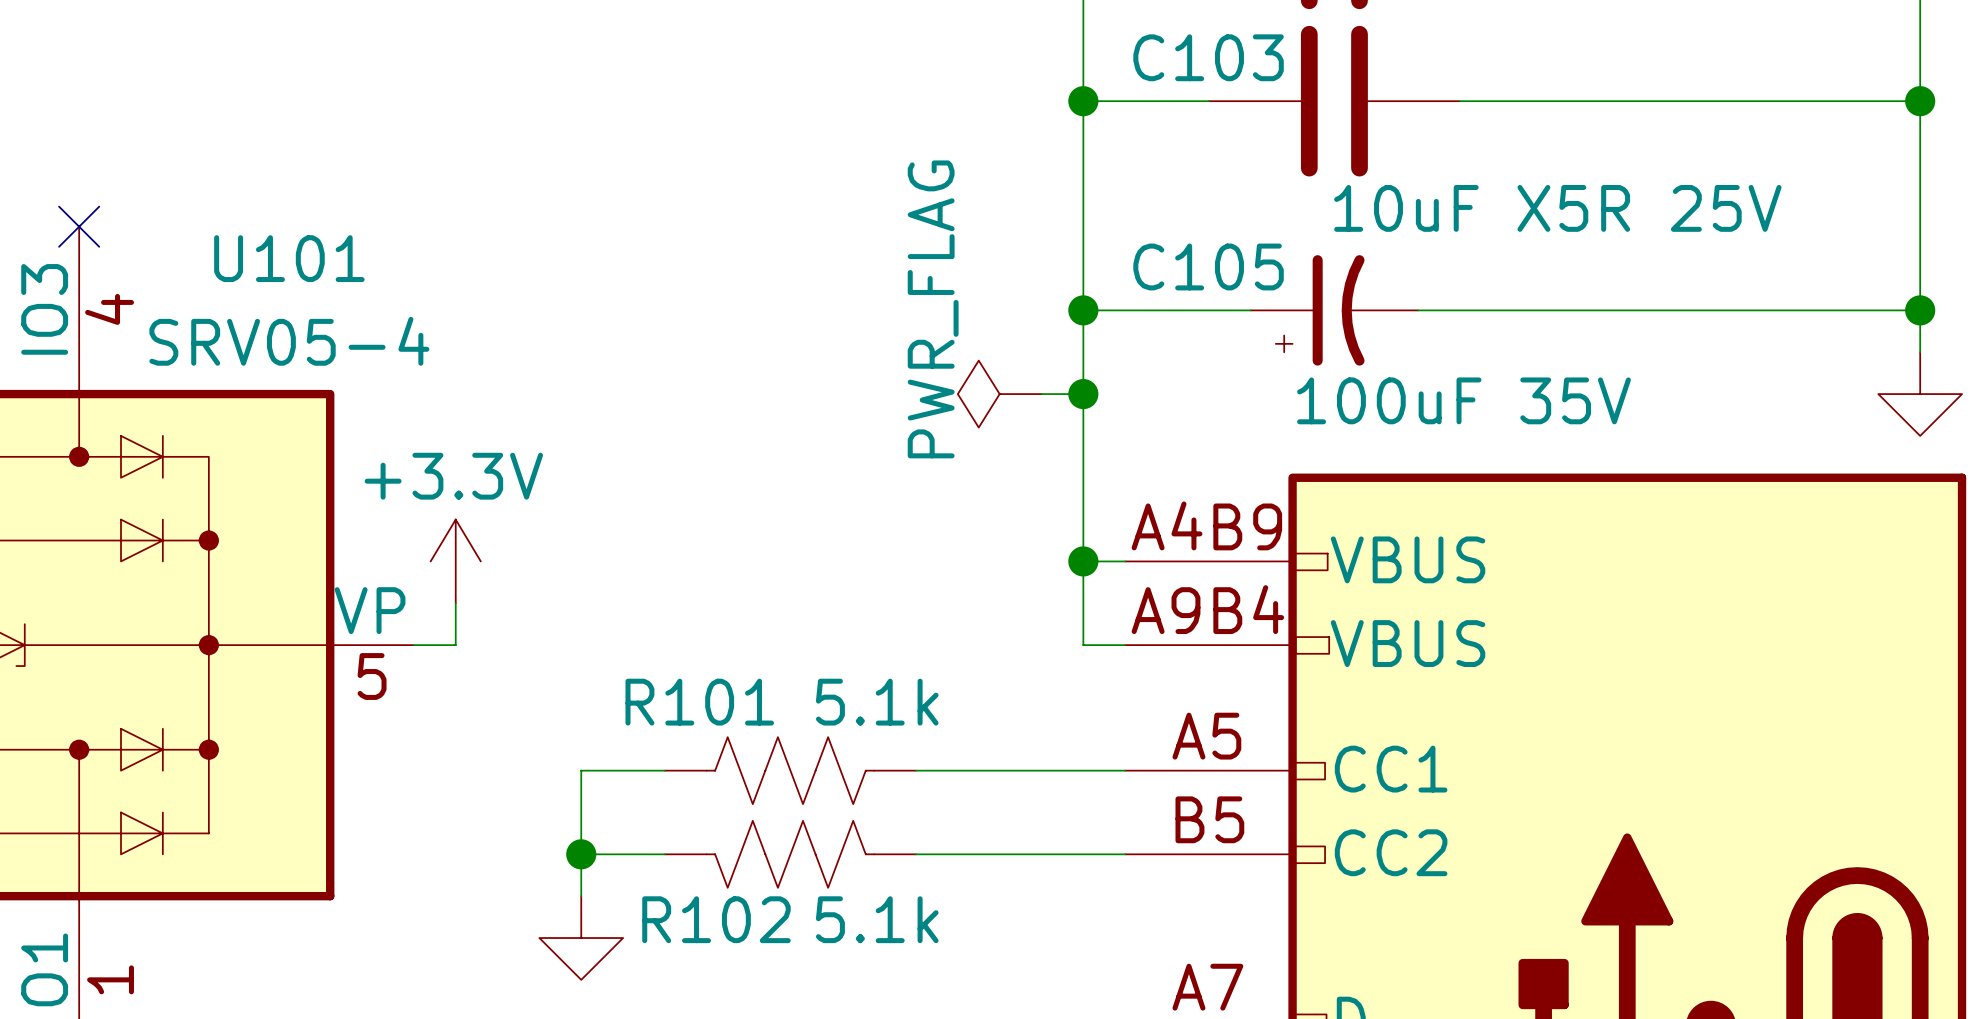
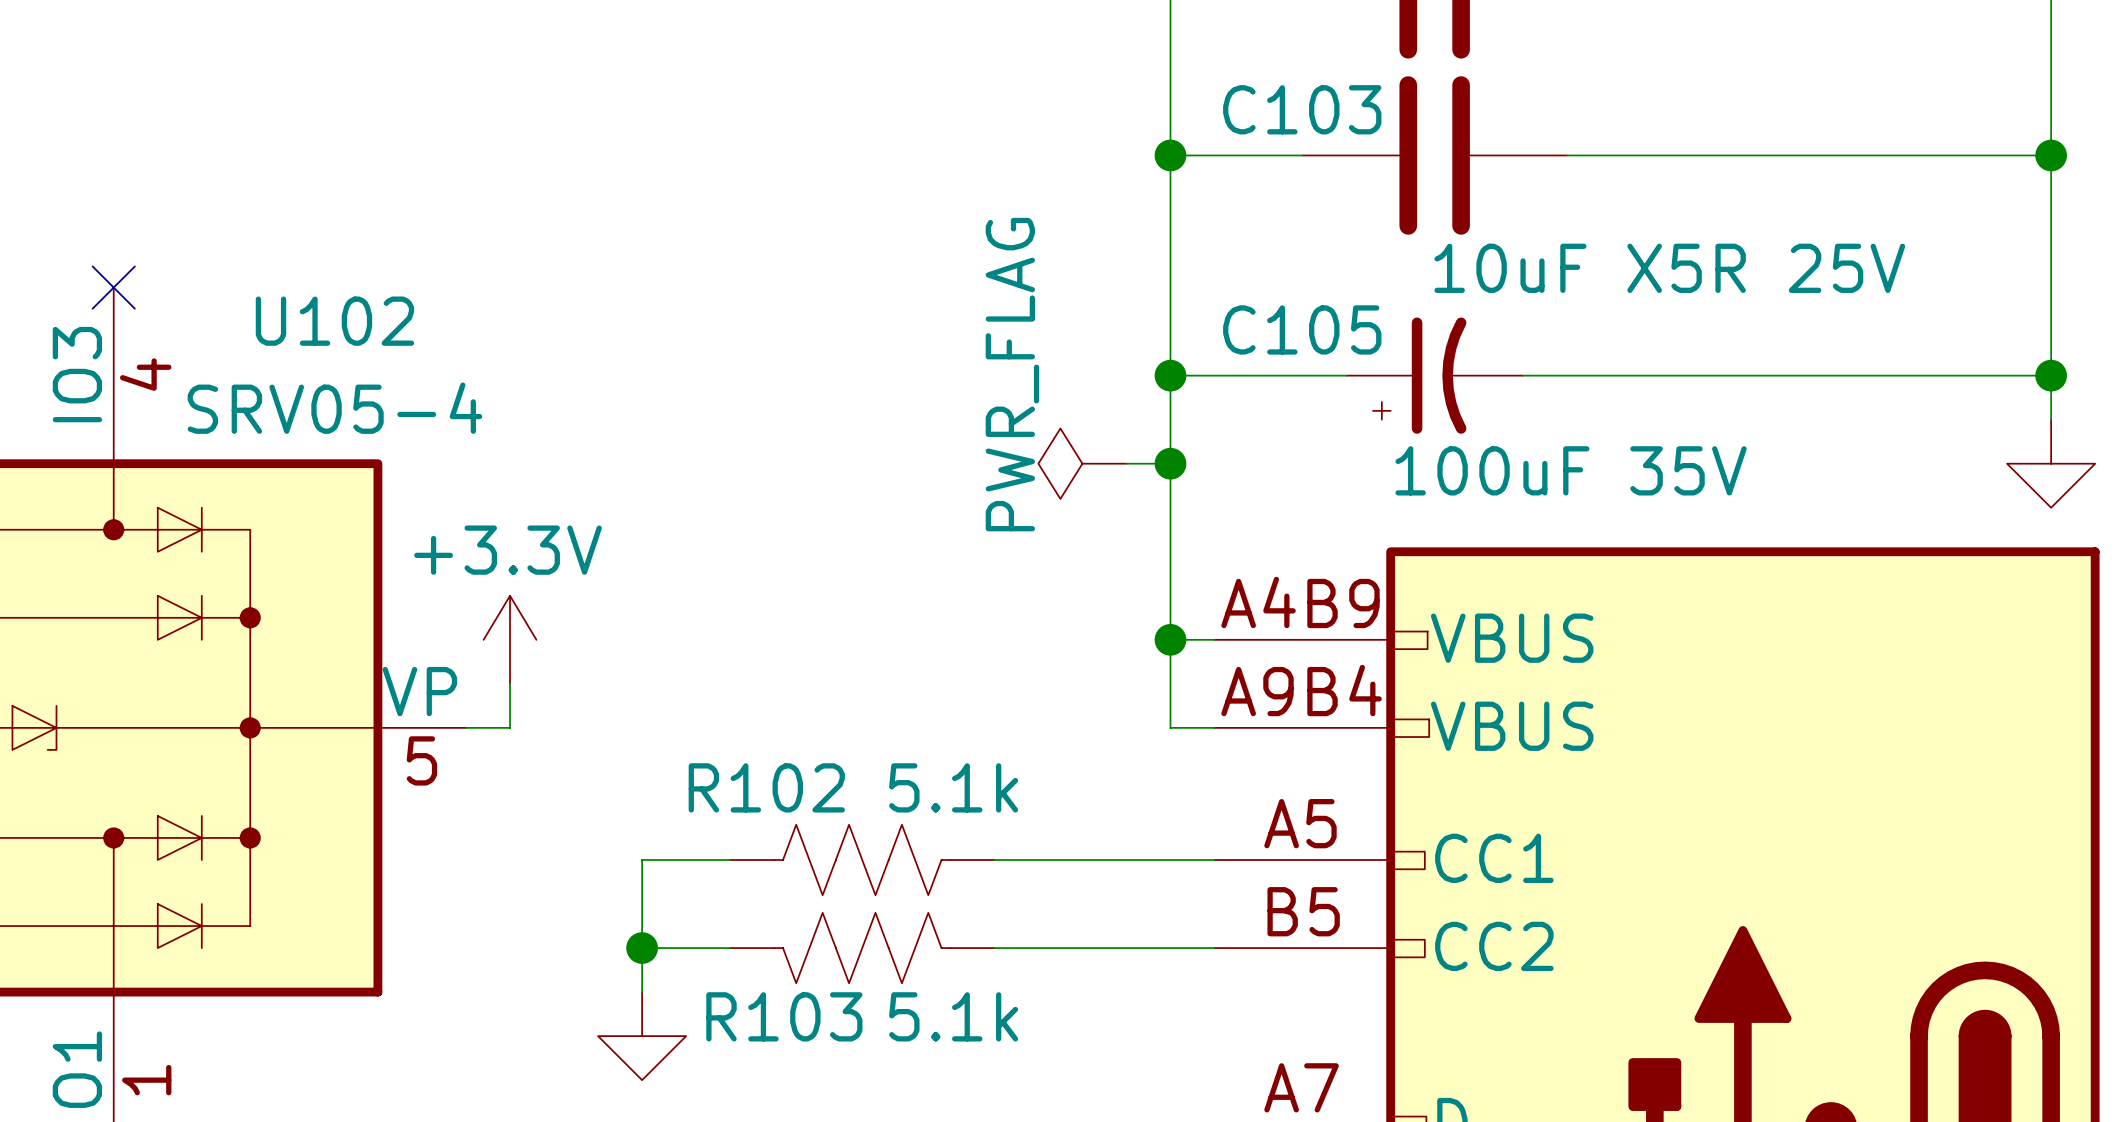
U101 name: U101 (289, 258) -> U102 (334, 321)
R101 name: R101 (699, 702) -> R102 (766, 787)
R102 name: R102 (716, 919) -> R103 (784, 1016)

